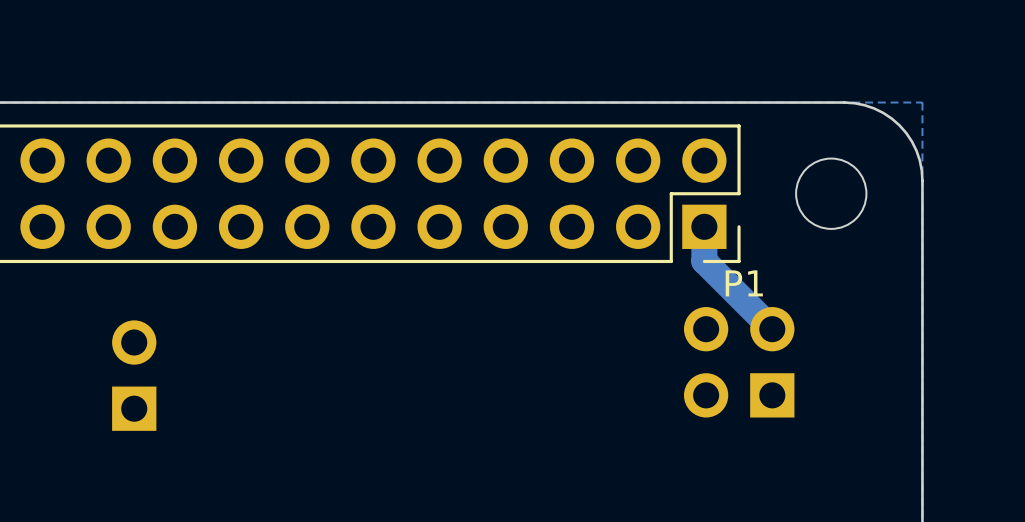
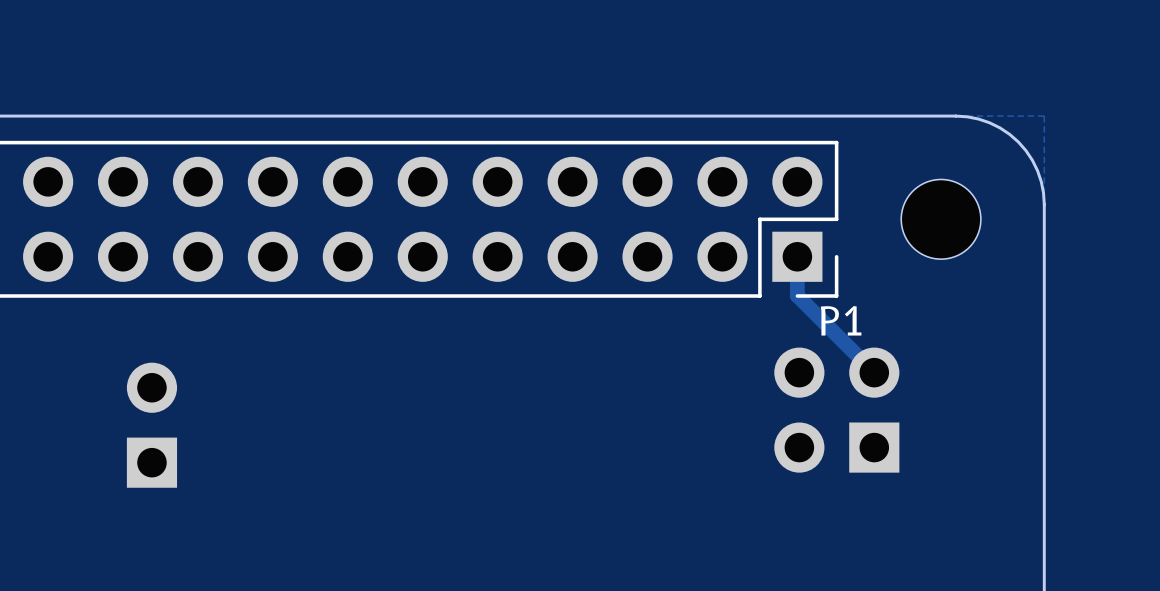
track width: thick (704, 226) (704, 261) (772, 329) -> thin (797, 256) (797, 295) (874, 372)

